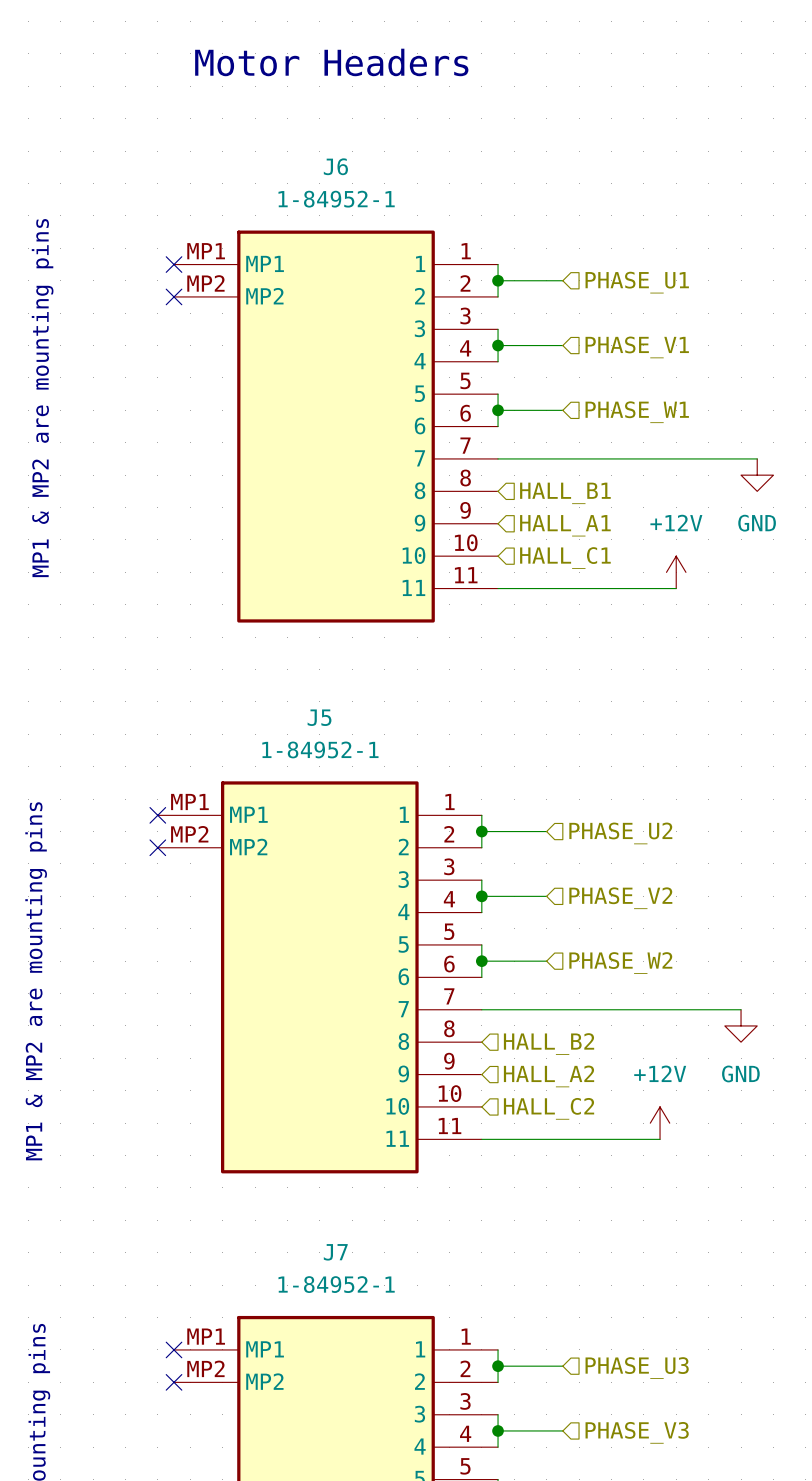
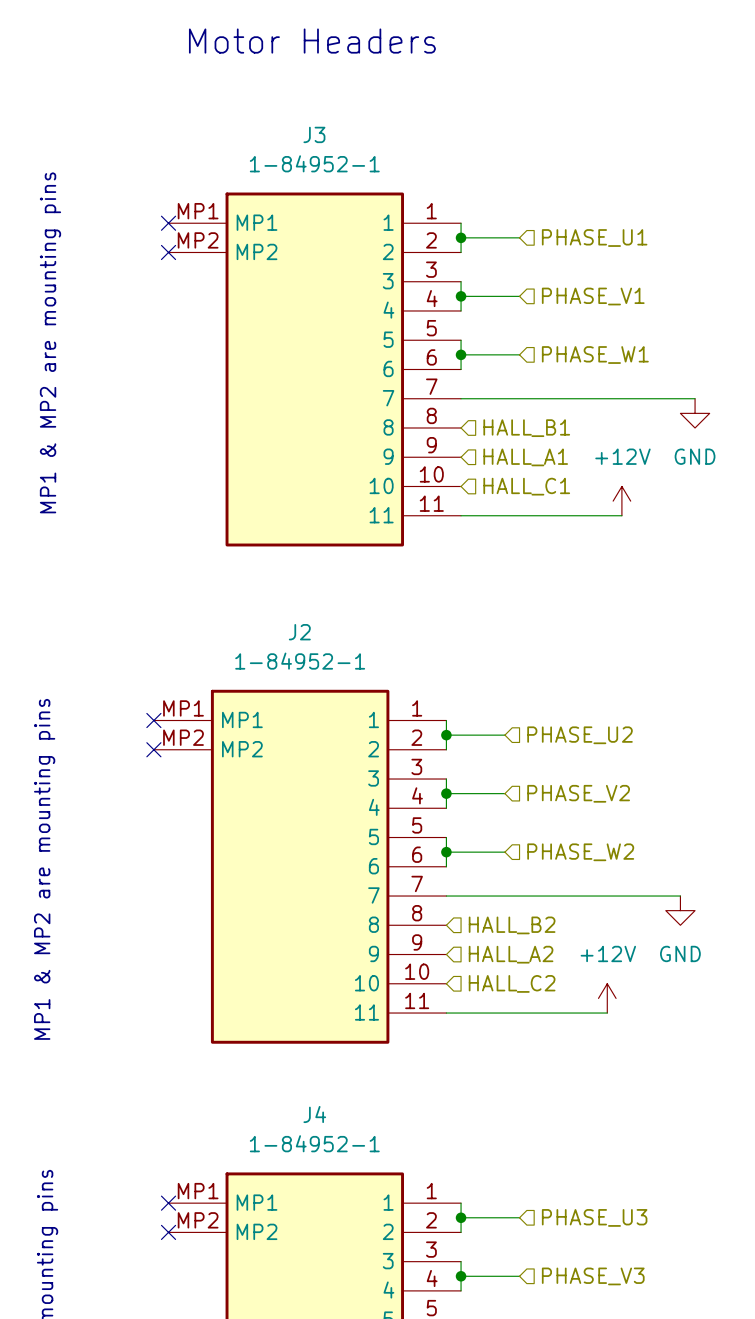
J6 name: J6 (335, 166) -> J3 (314, 134)
J5 name: J5 (319, 717) -> J2 (299, 632)
J7 name: J7 (335, 1252) -> J4 (314, 1114)

